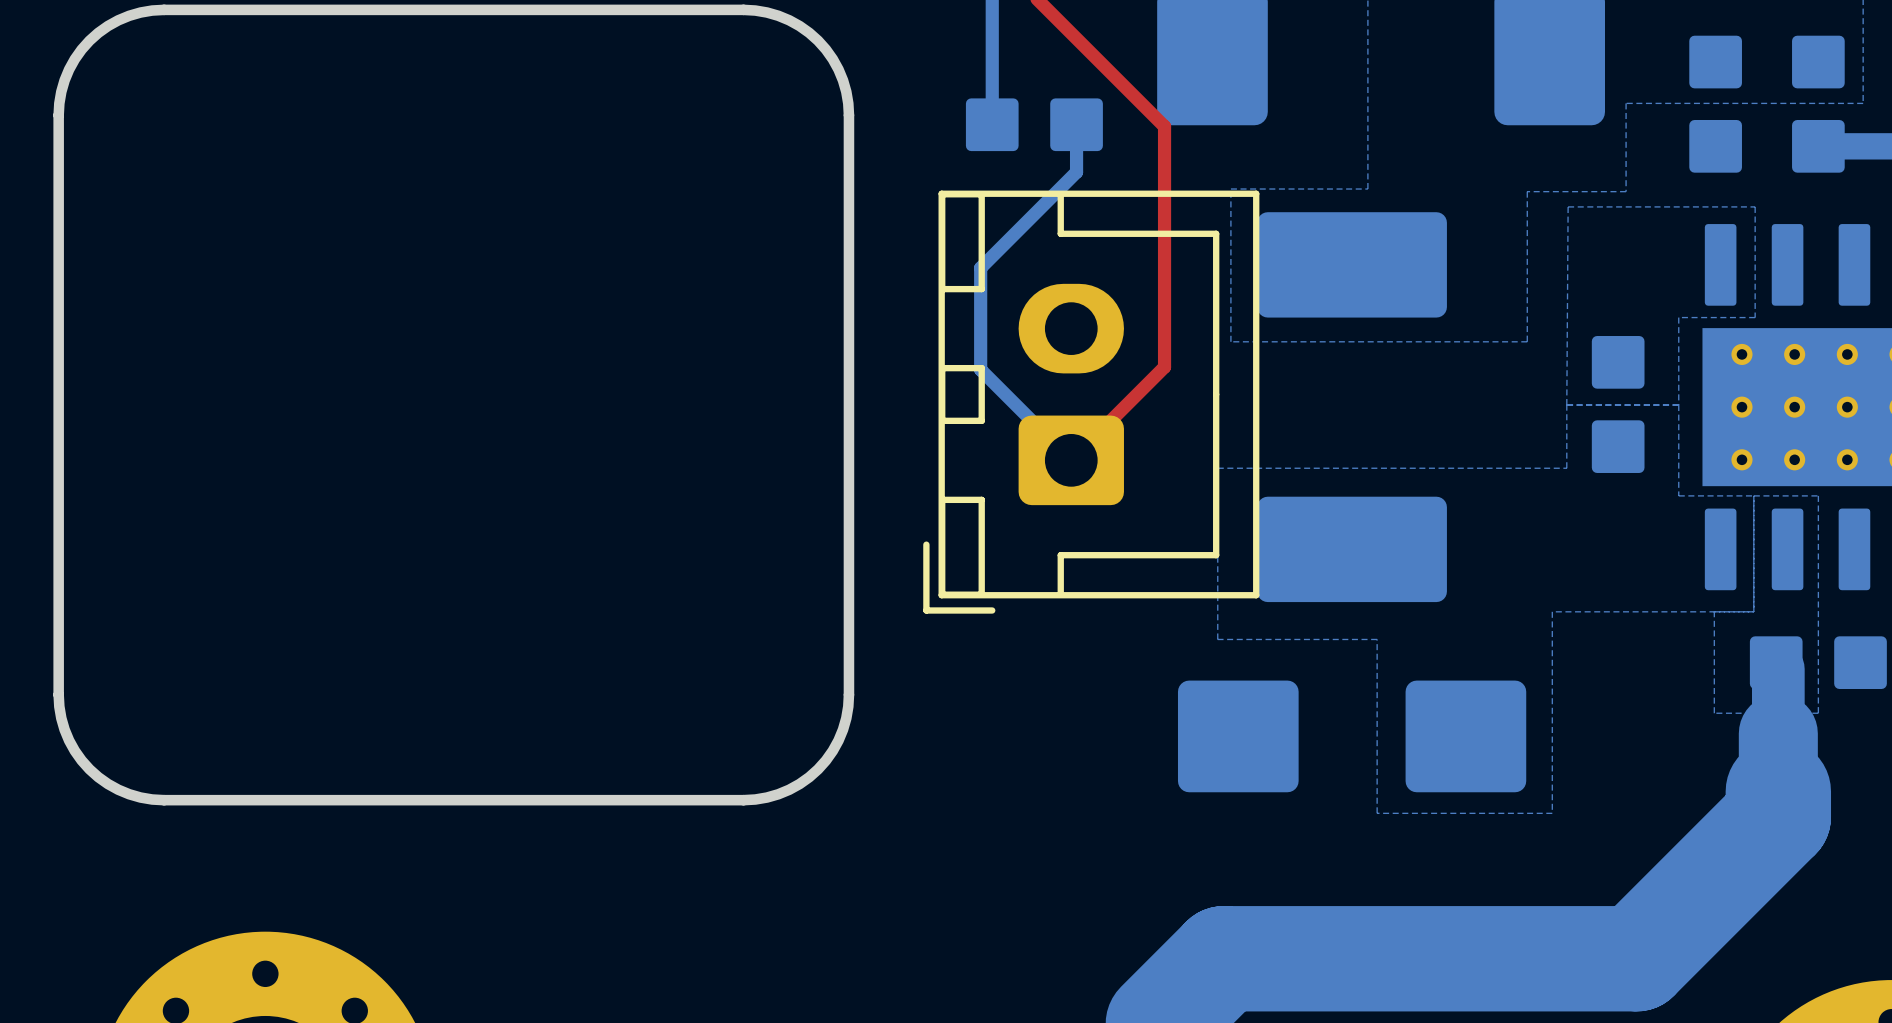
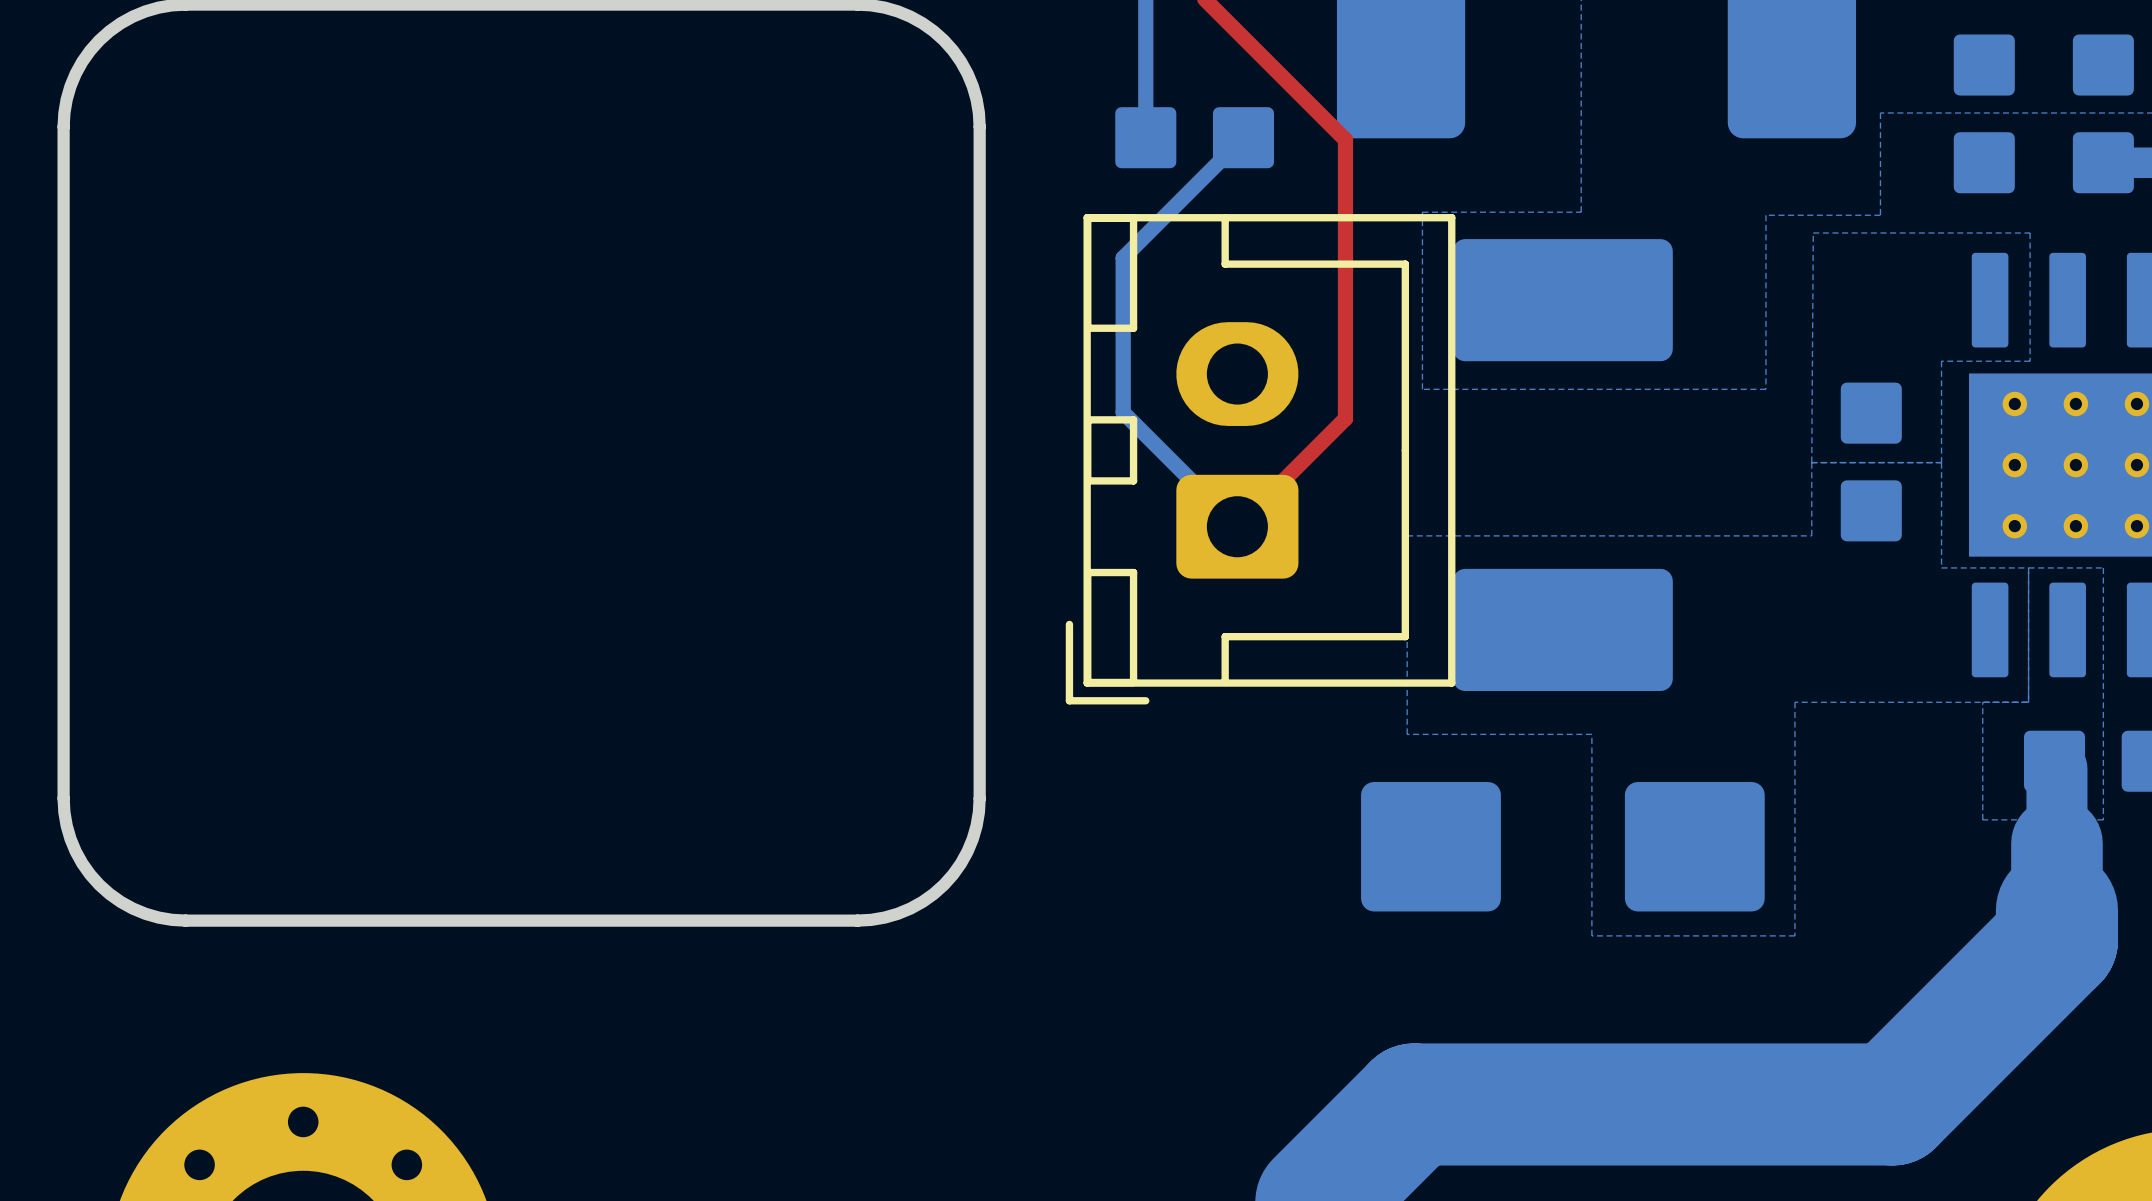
bottom track: (1076, 124) (1076, 172) (980, 268) (980, 369) -> (1243, 137) (1123, 258) (1123, 412) (1132, 421)

